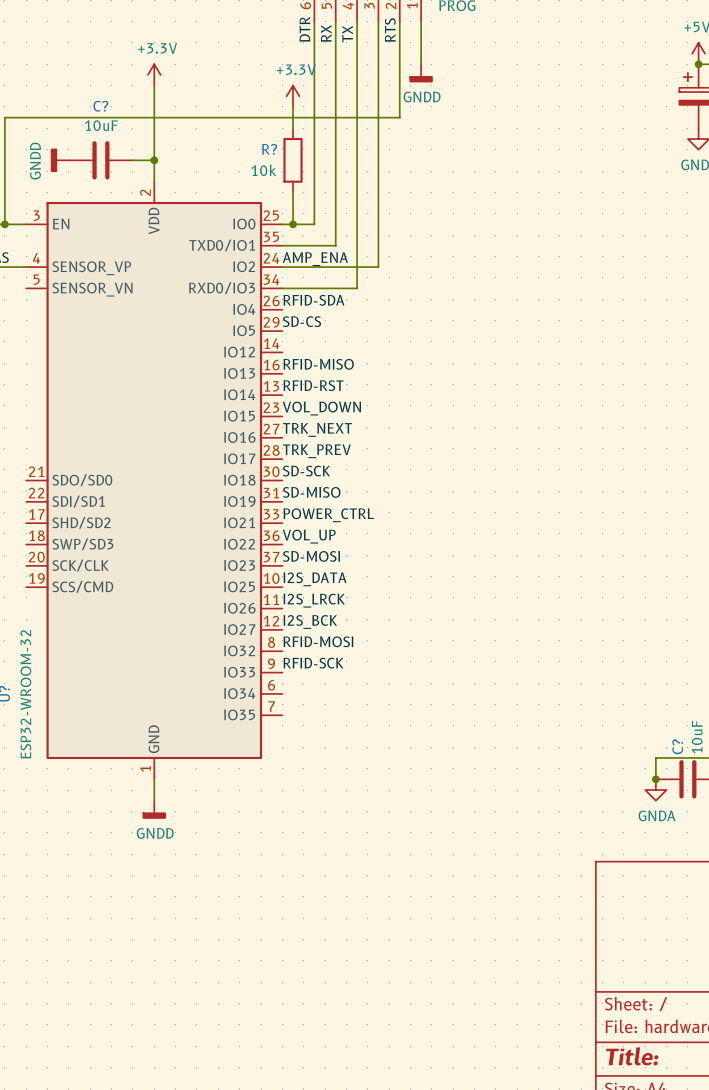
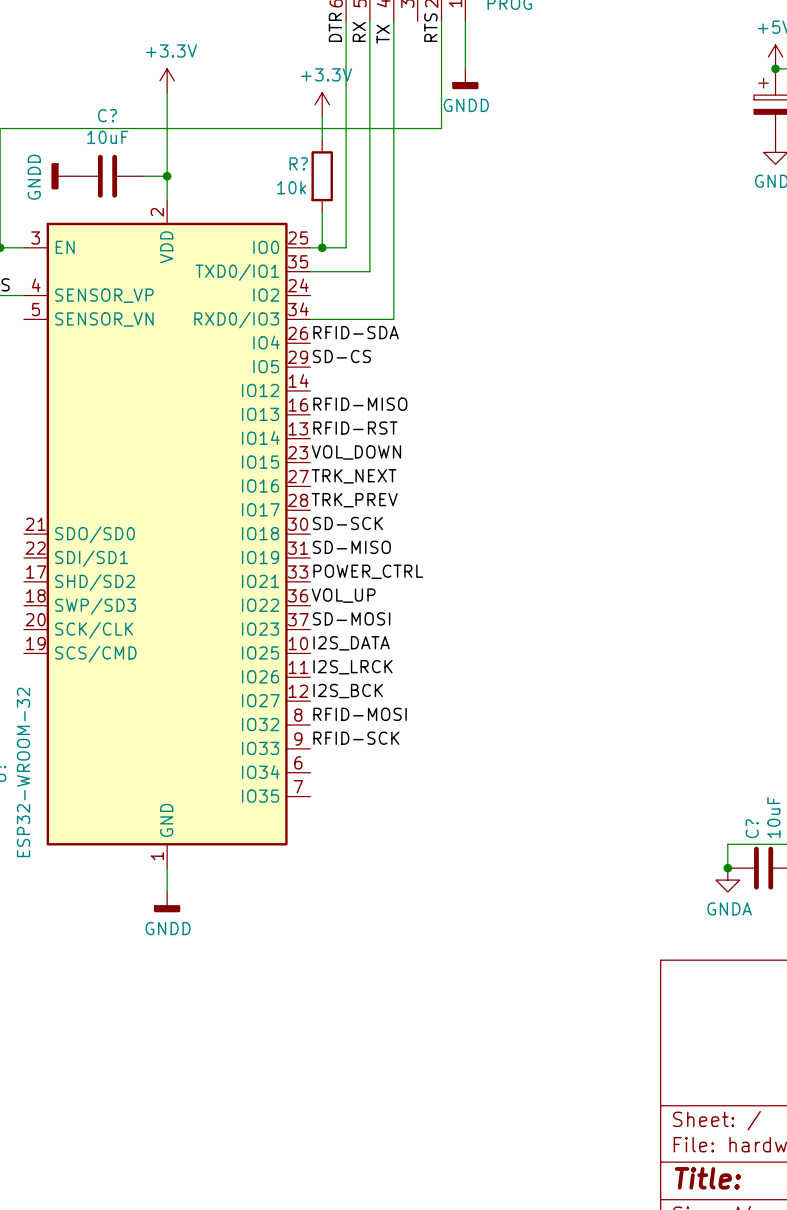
wire: (378, 21) (378, 267) (282, 267) -> none
label: AMP_ENA (315, 259) -> none

